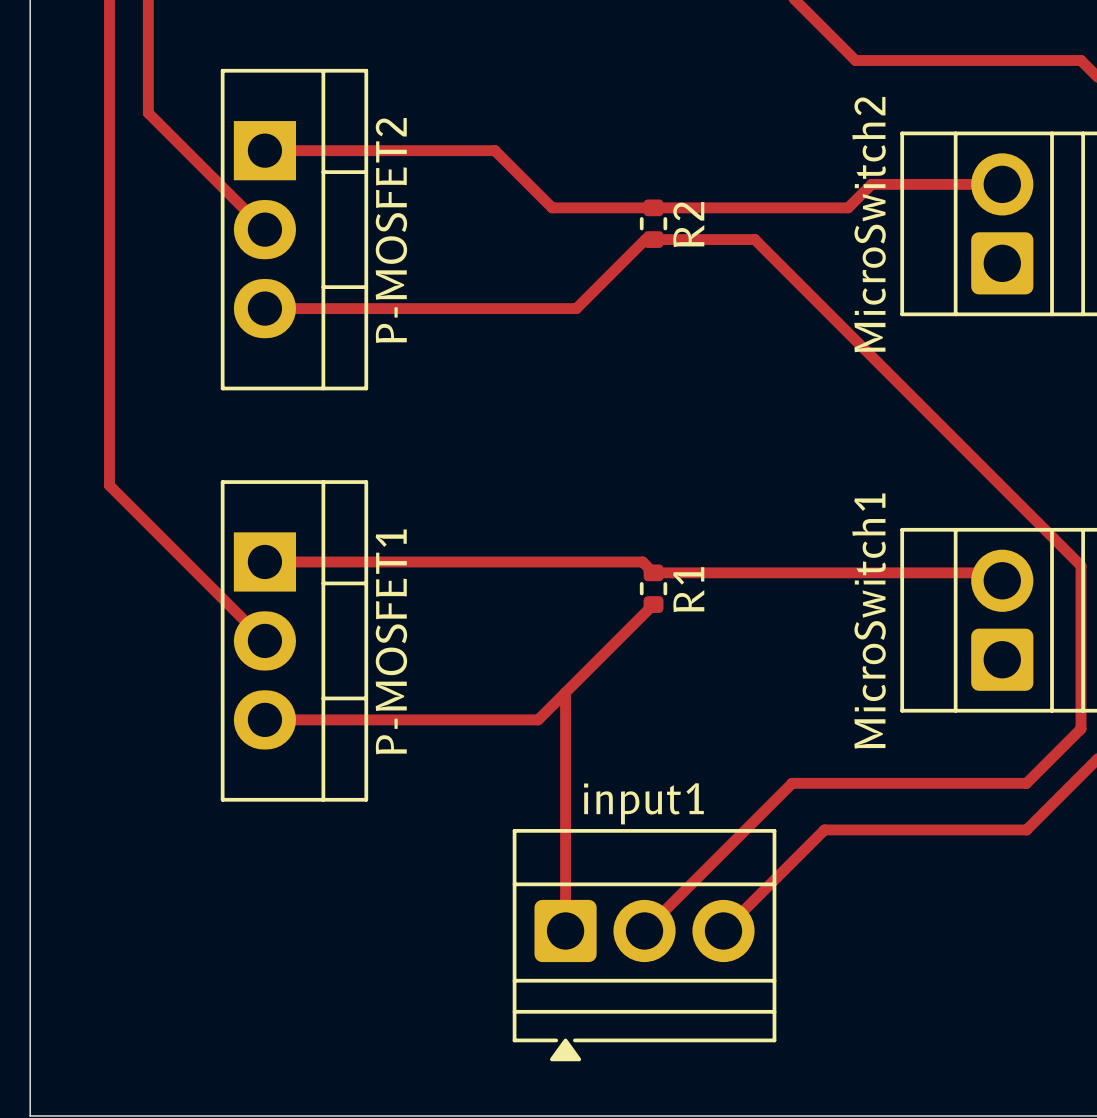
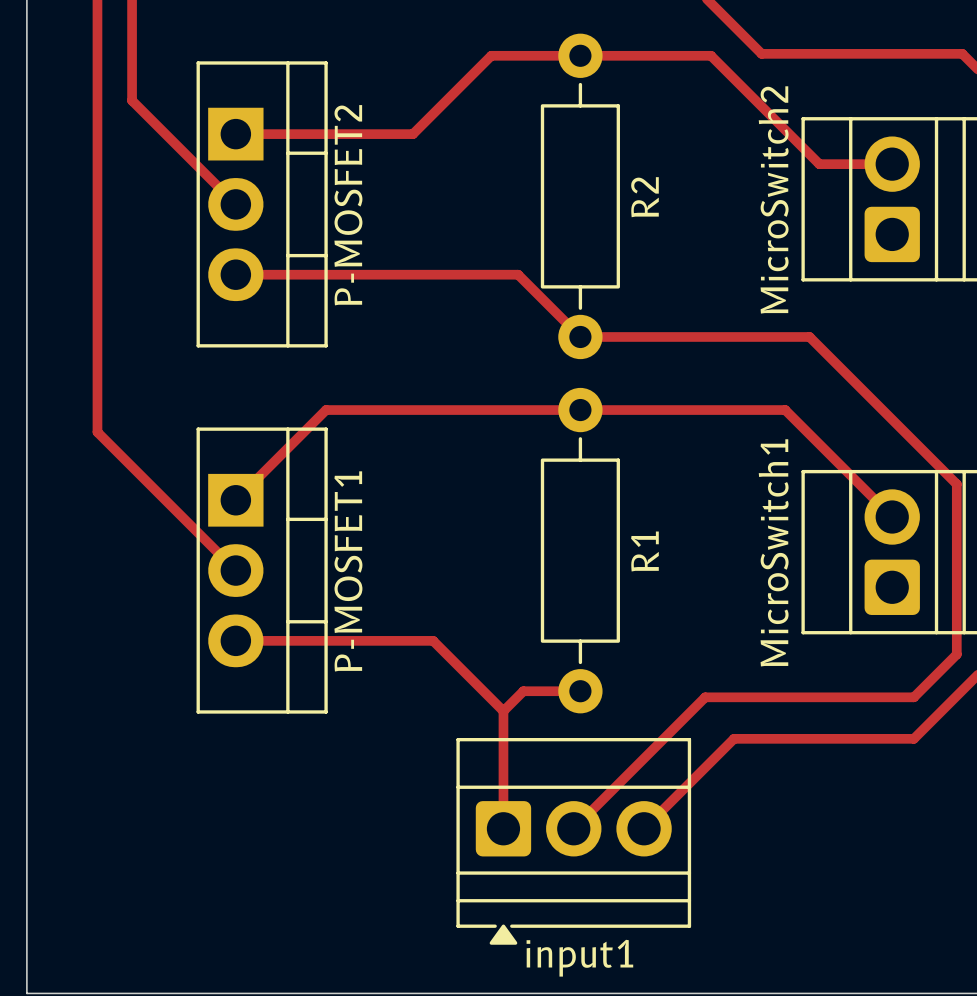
track: (463, 150) (494, 150) (552, 207) (848, 207) (871, 184) (920, 184) -> (412, 134) (491, 55) (711, 55) (819, 164)
R2 footprint: [639, 199, 668, 248] -> [540, 33, 620, 360]
track: (576, 308) (645, 239) (754, 239) (1081, 565) (1081, 728) (1074, 735) -> (513, 274) (518, 274) (580, 336) (809, 336) (956, 484) (956, 654)
track: (264, 561) (642, 561) (653, 572) (994, 572) -> (235, 500) (326, 410) (785, 410) (885, 509)
R1 footprint: [639, 564, 668, 613] -> [540, 387, 620, 714]
track: (653, 604) (538, 719) (486, 719) -> (580, 691) (523, 691) (503, 711) (433, 640)
track: (565, 692) (565, 798) -> none
input1 name position: input1 (643, 803) -> input1 (579, 958)

